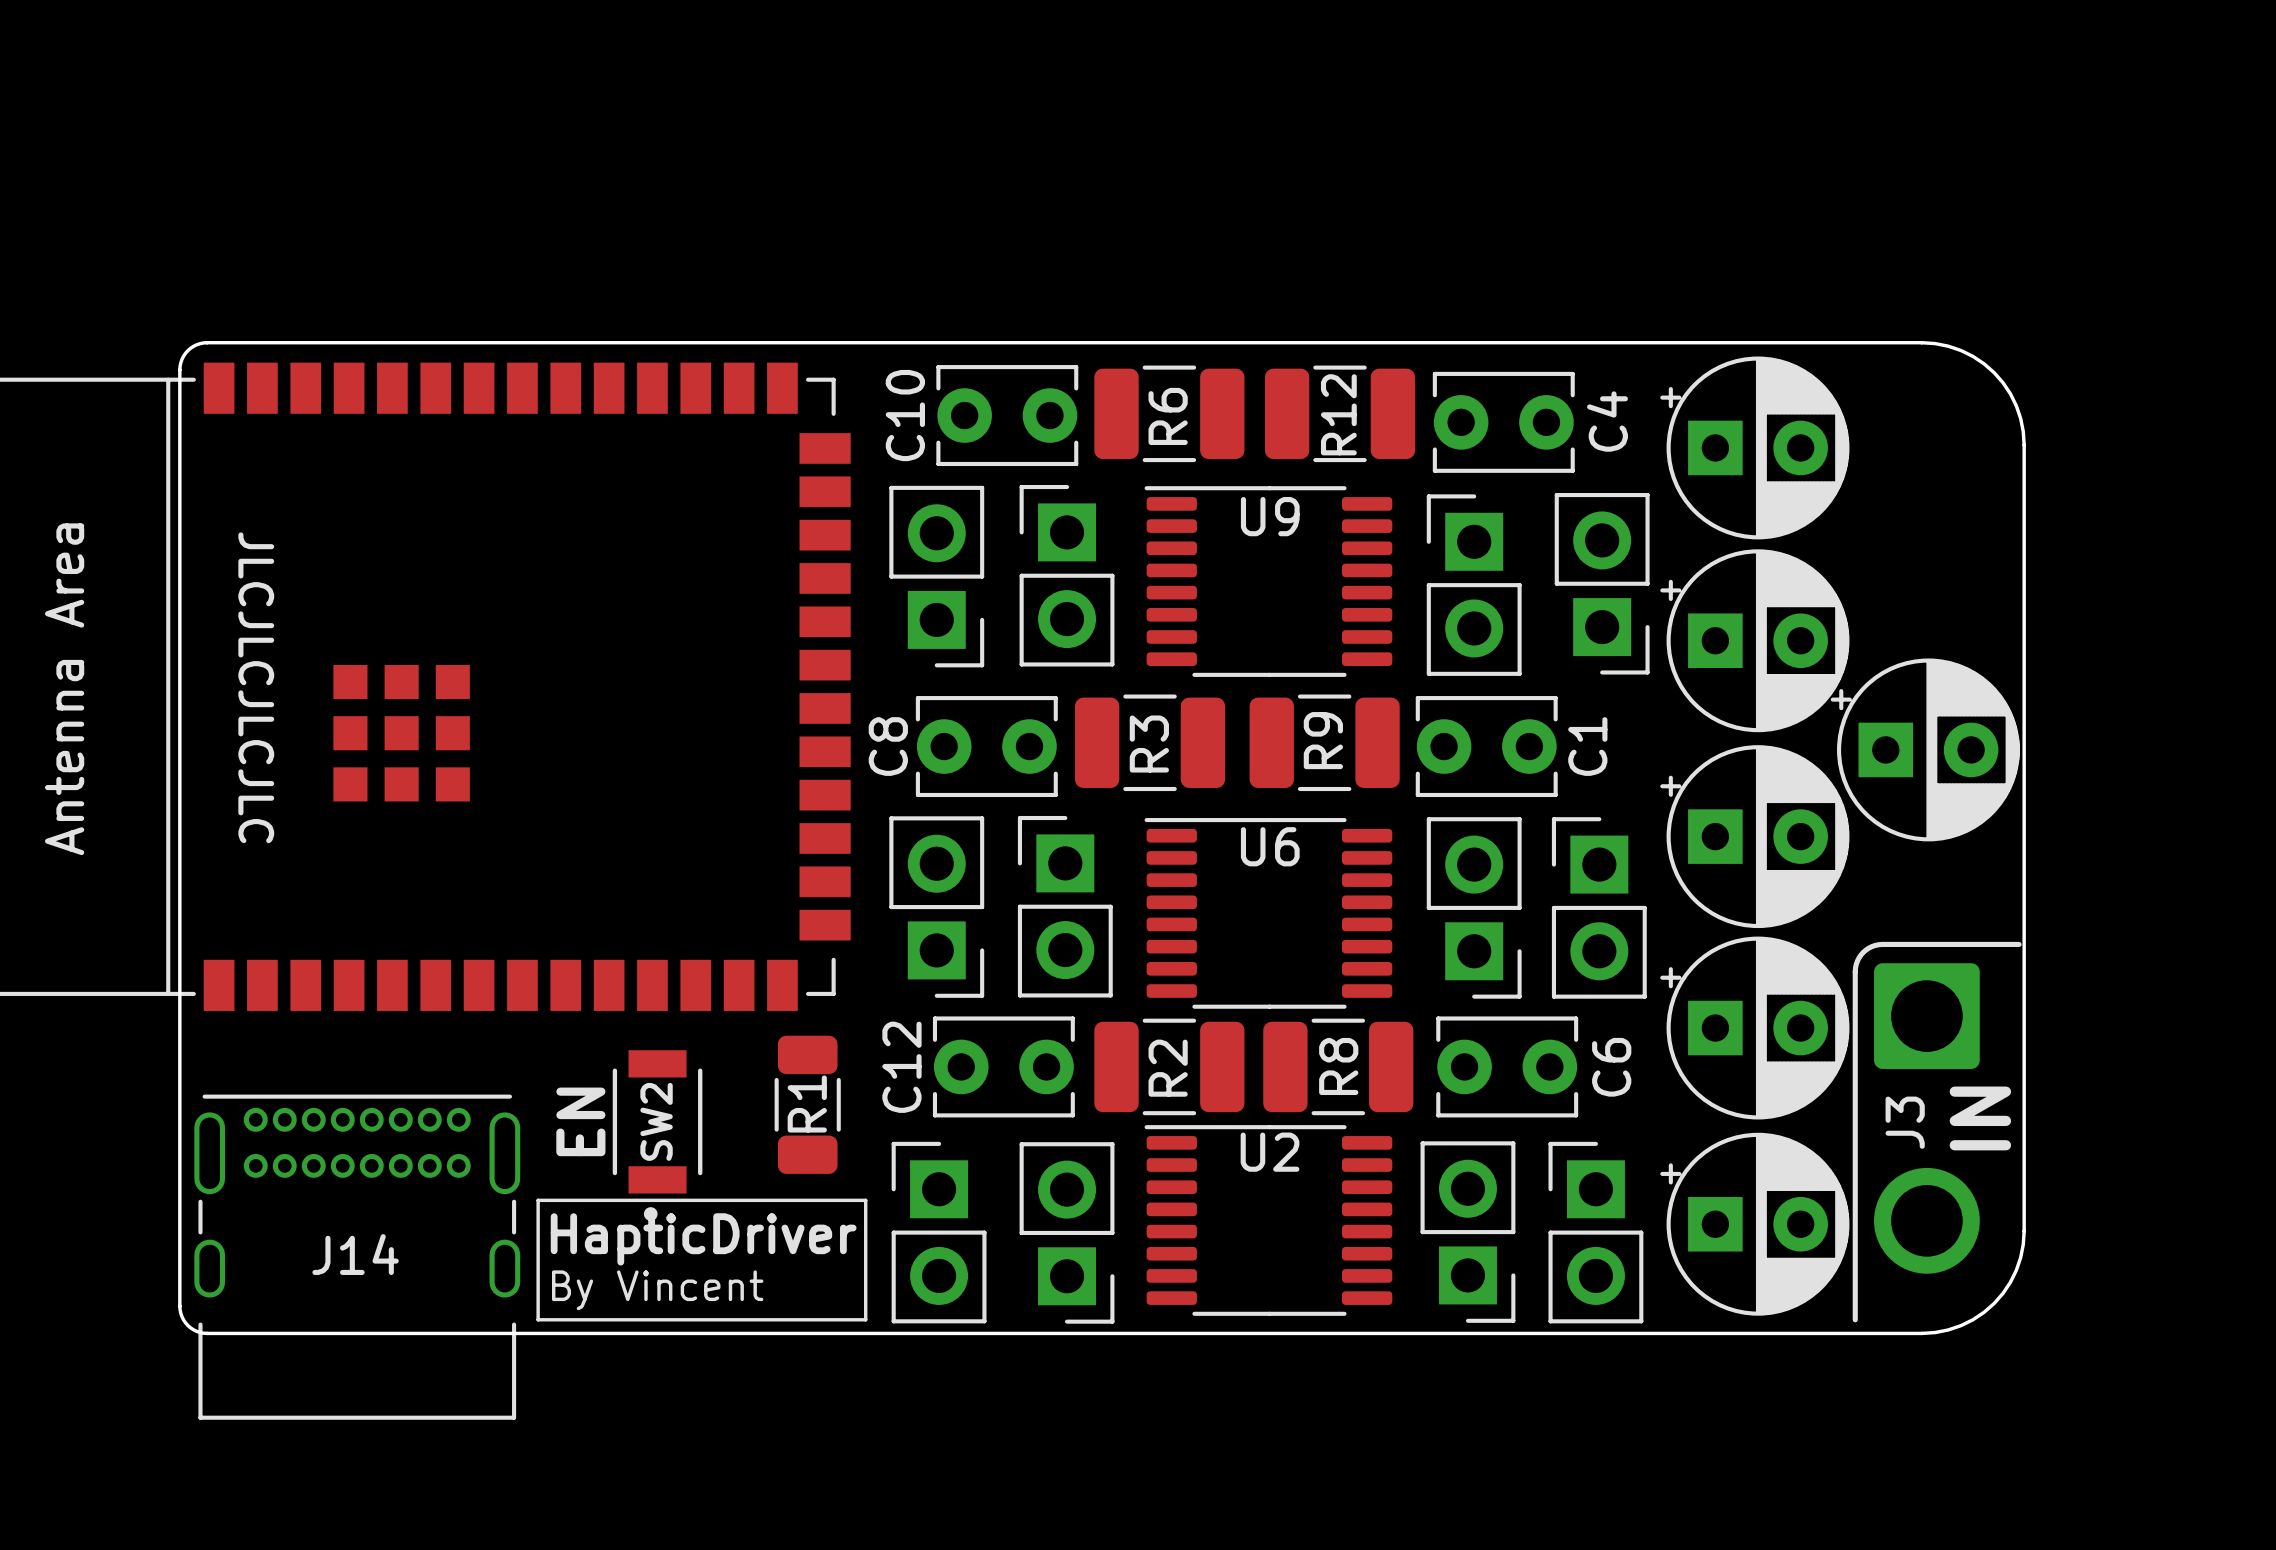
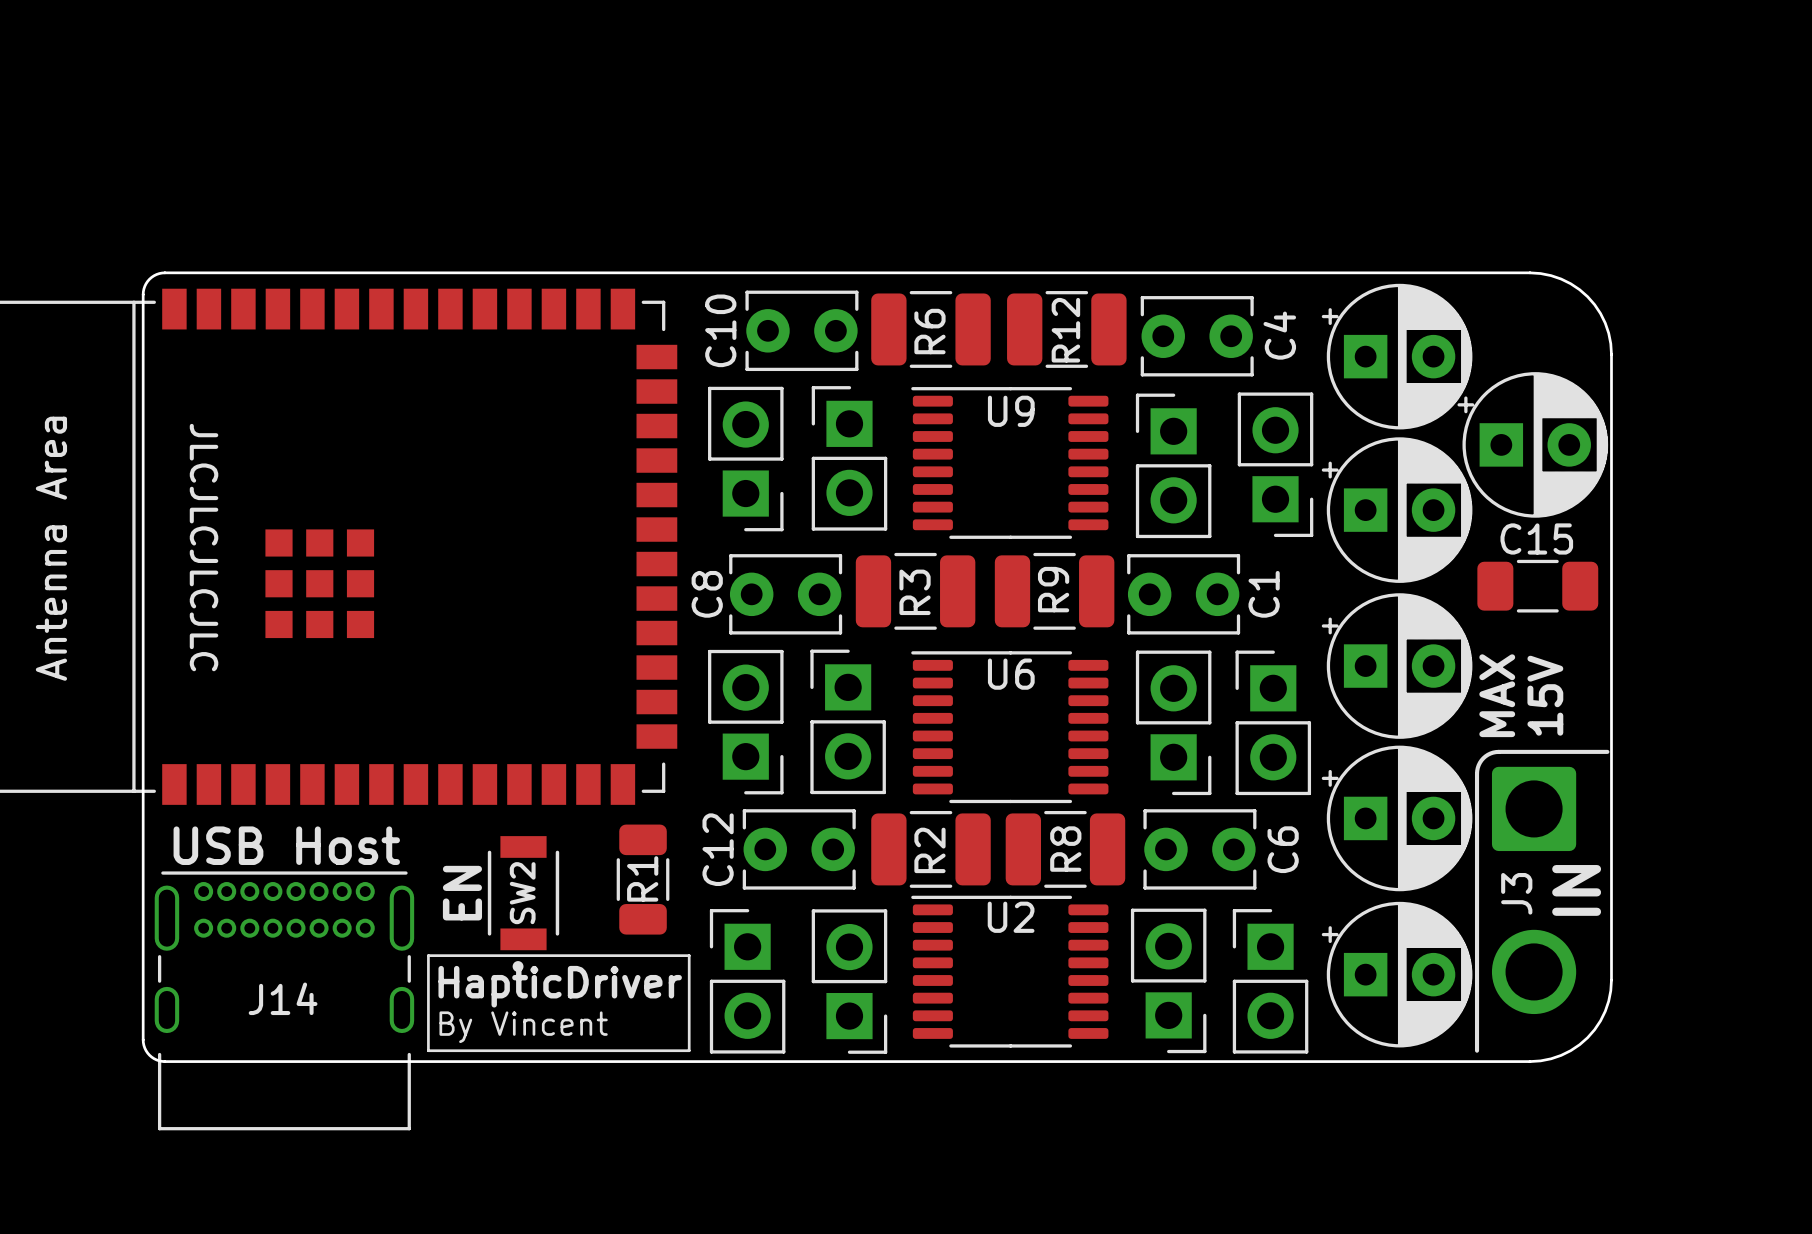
C15: none -> (1537, 586)
part position: (1925, 749) -> (1532, 444)
text: none -> MAX (1497, 695)
text: none -> 15V (1545, 695)
text: none -> USB Host (286, 845)

